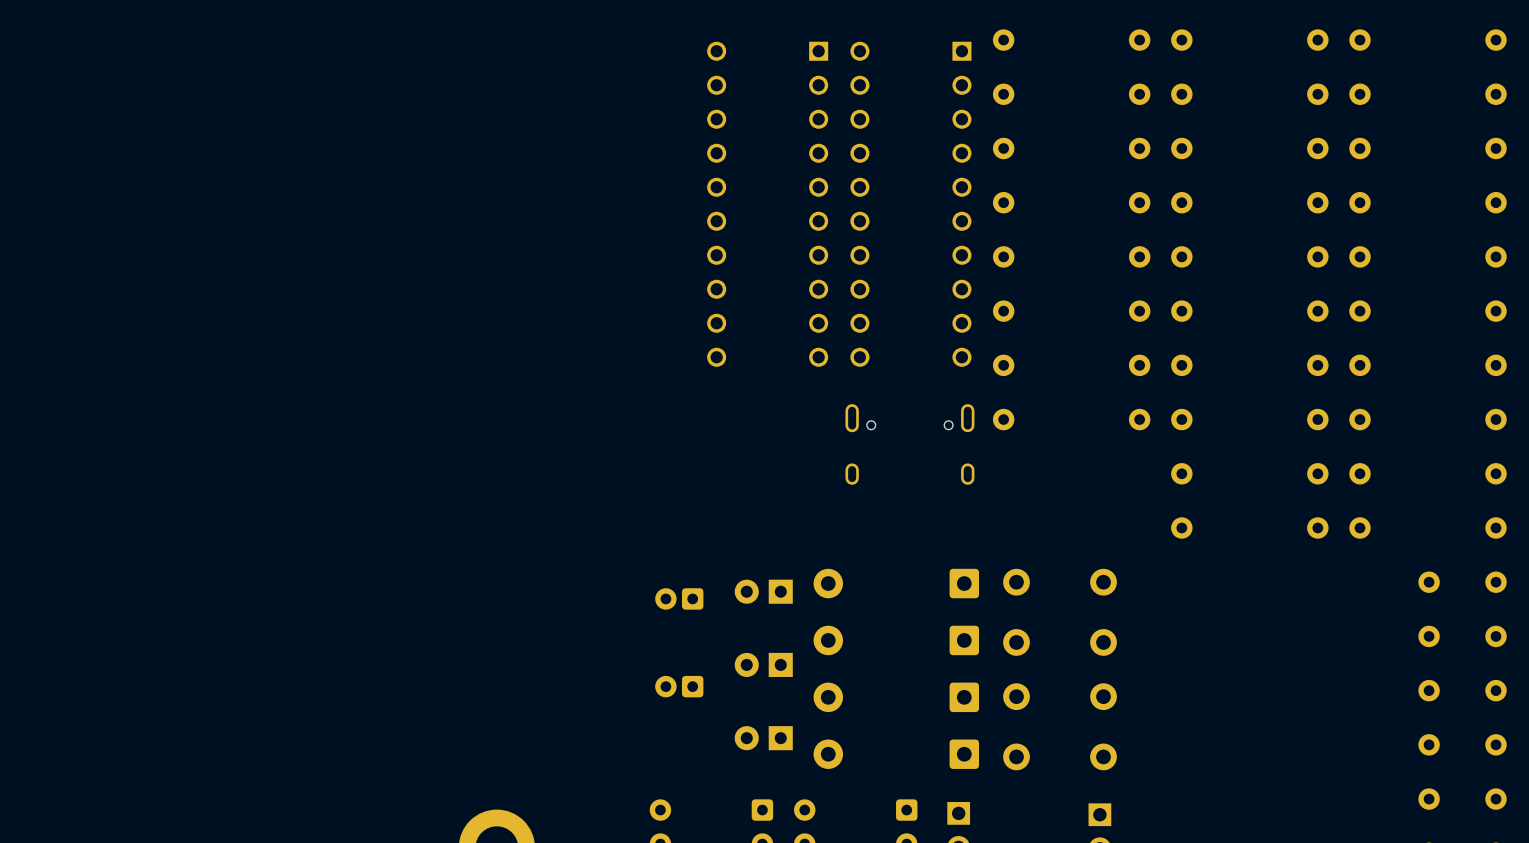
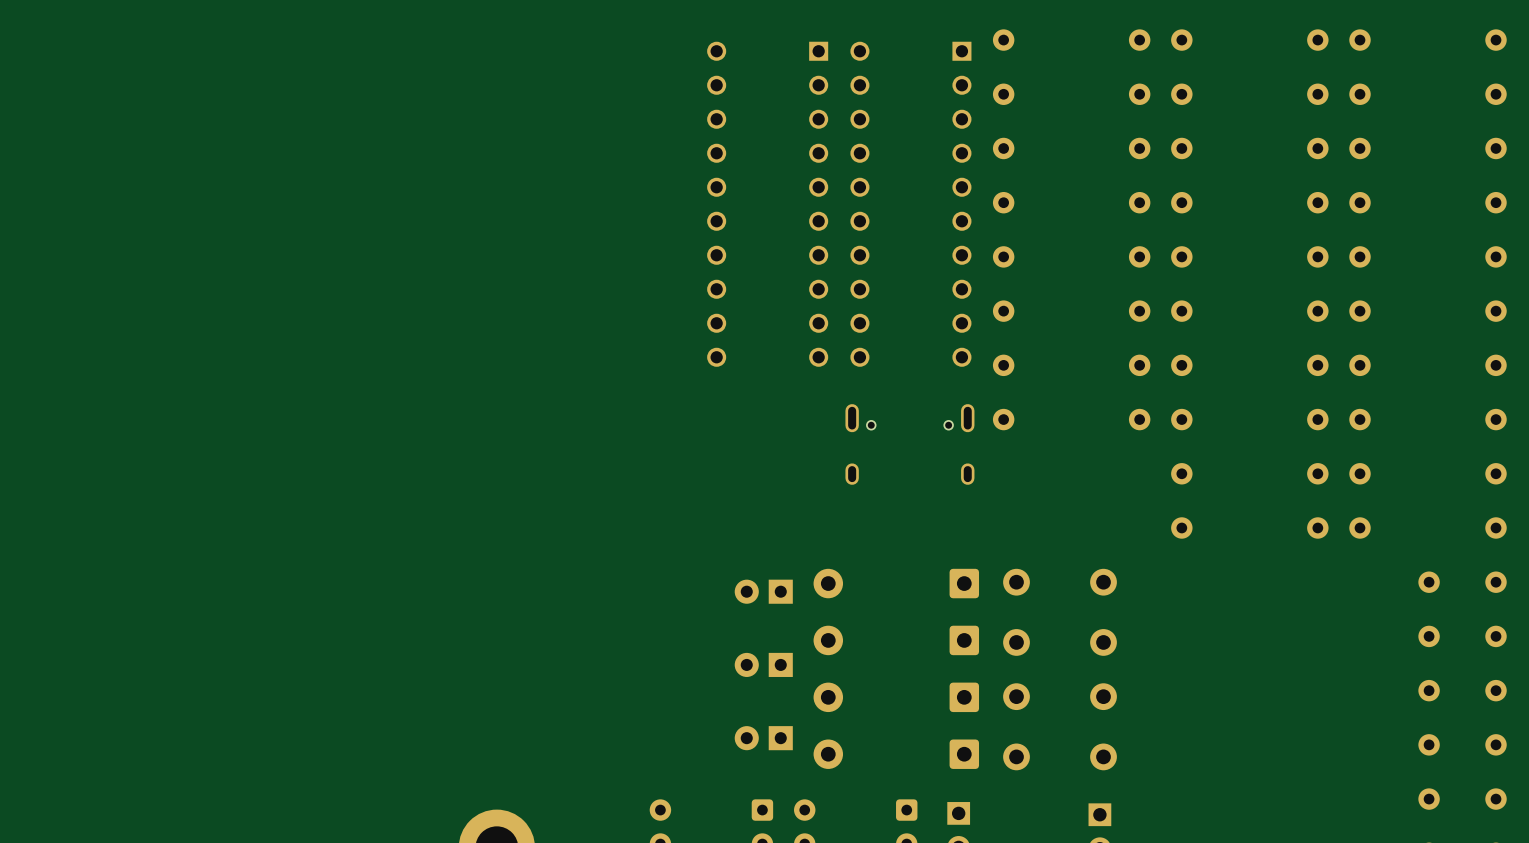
part: (679, 598) -> none
part: (679, 686) -> none

